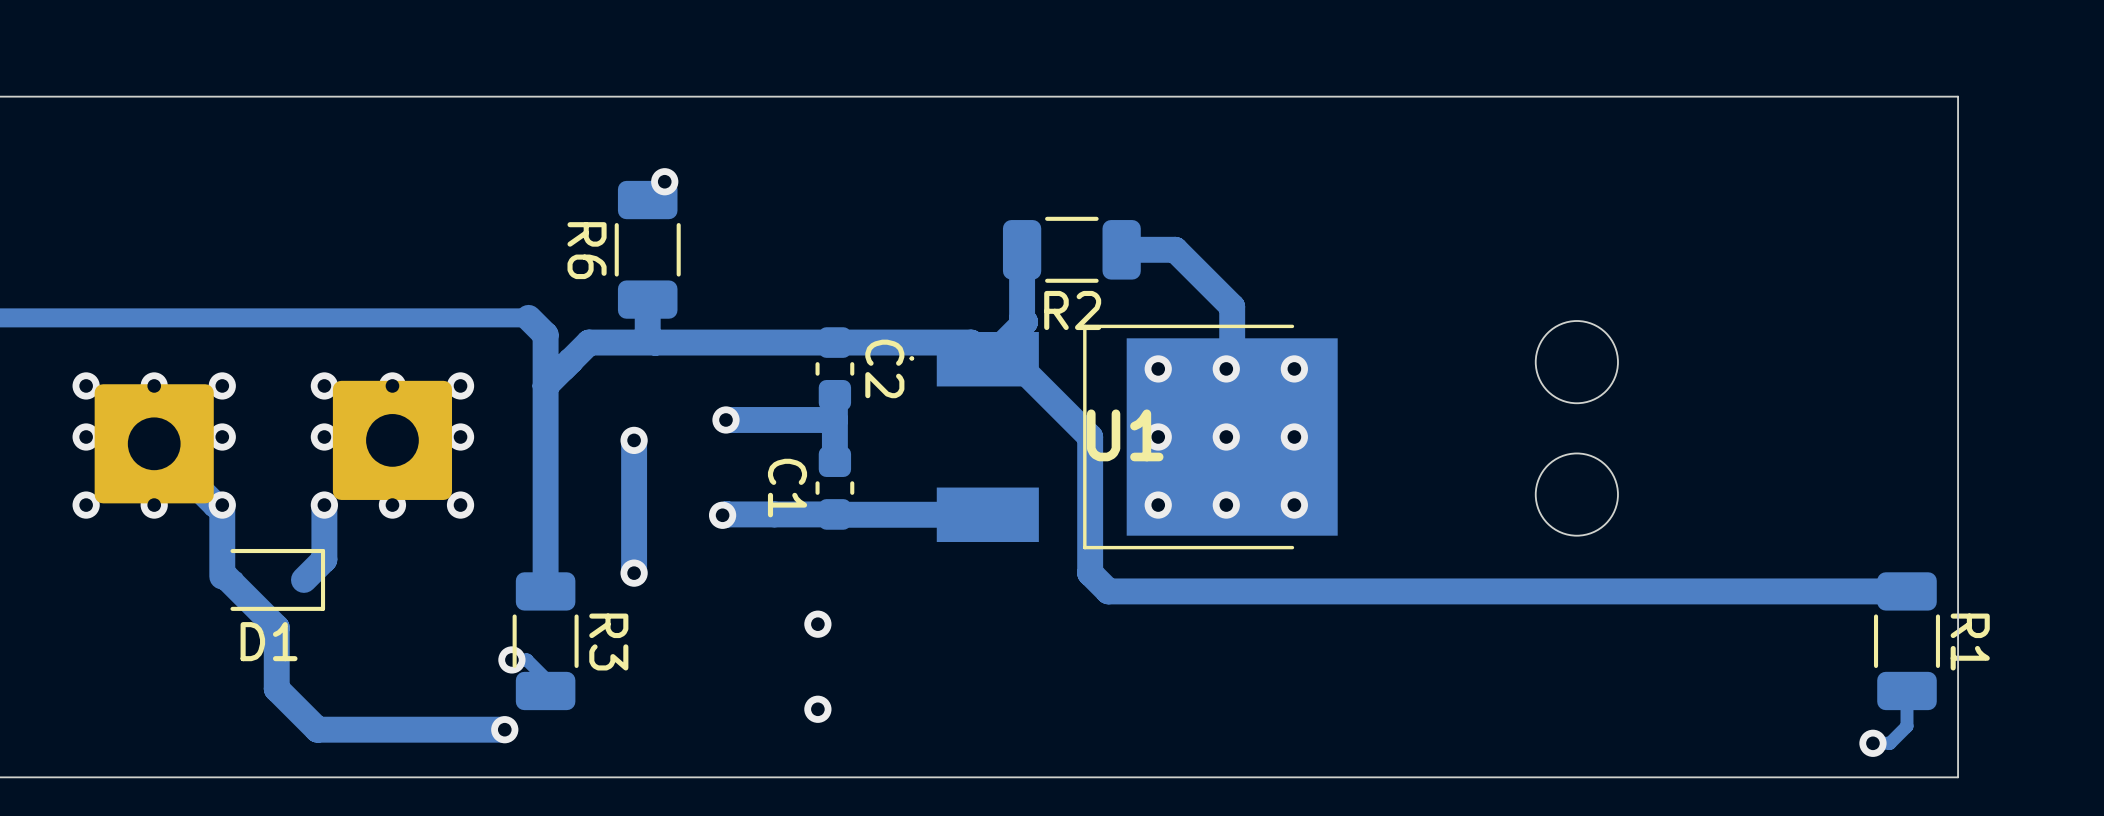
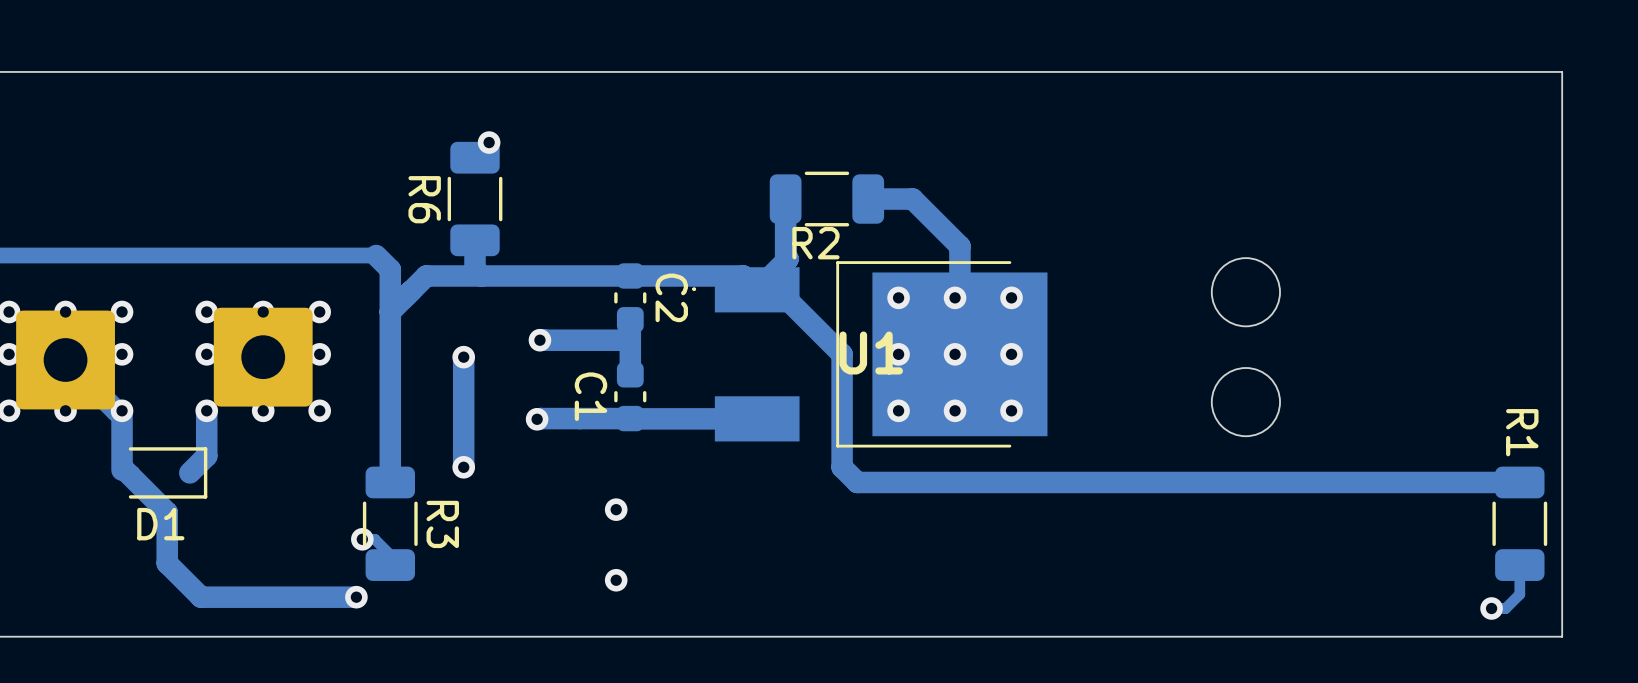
R2 name position: R2 (1072, 310) -> R2 (815, 243)
R1 name position: R1 (1970, 642) -> R1 (1522, 432)

